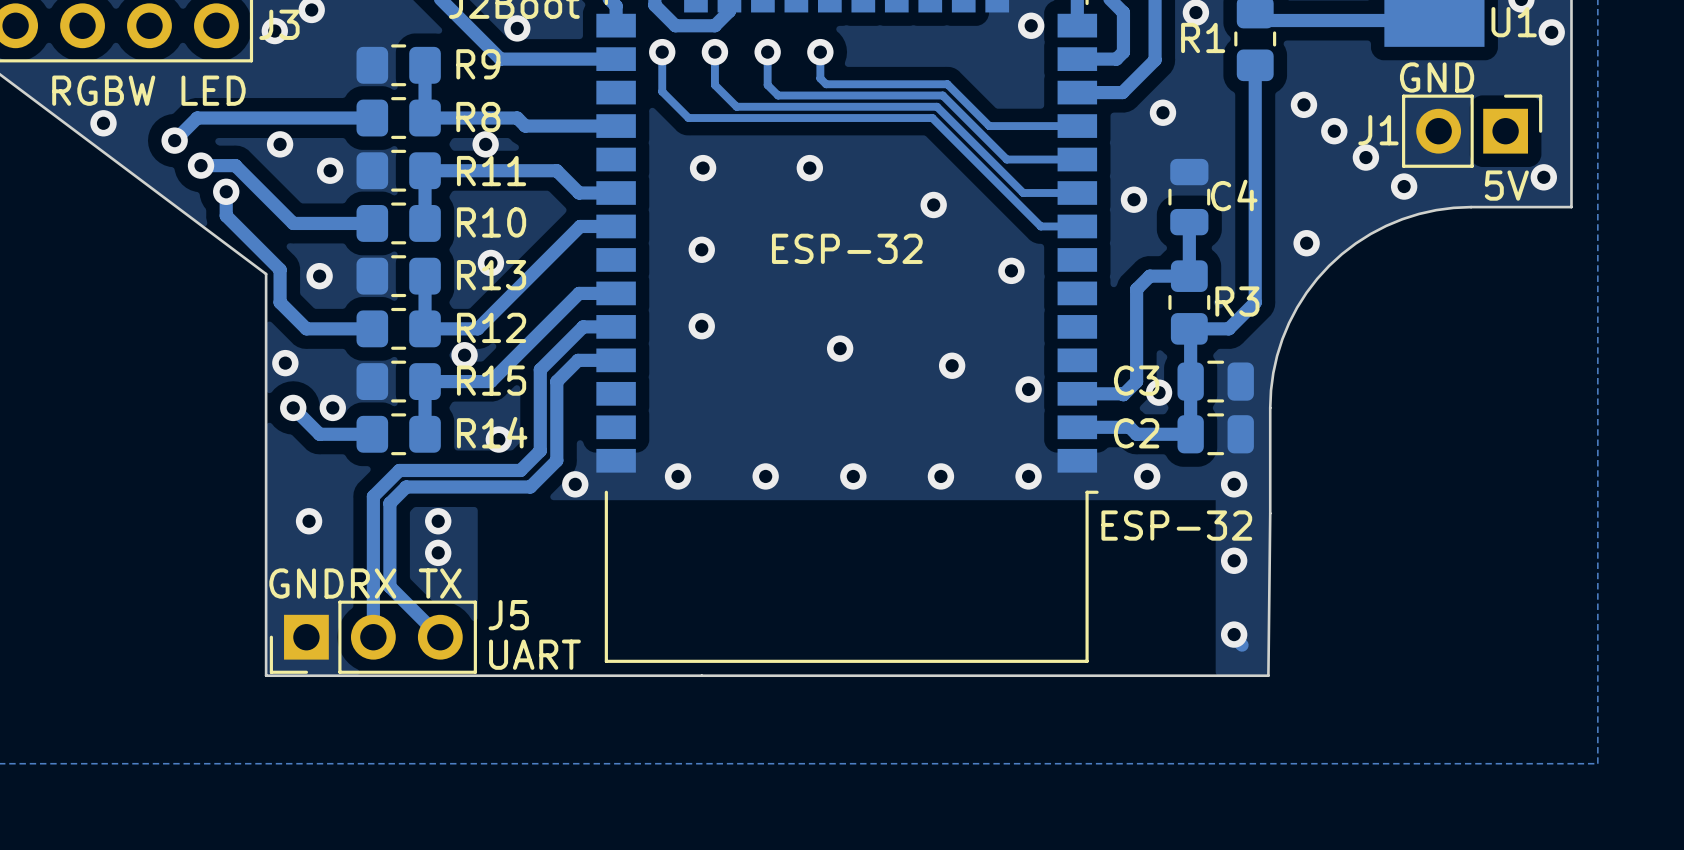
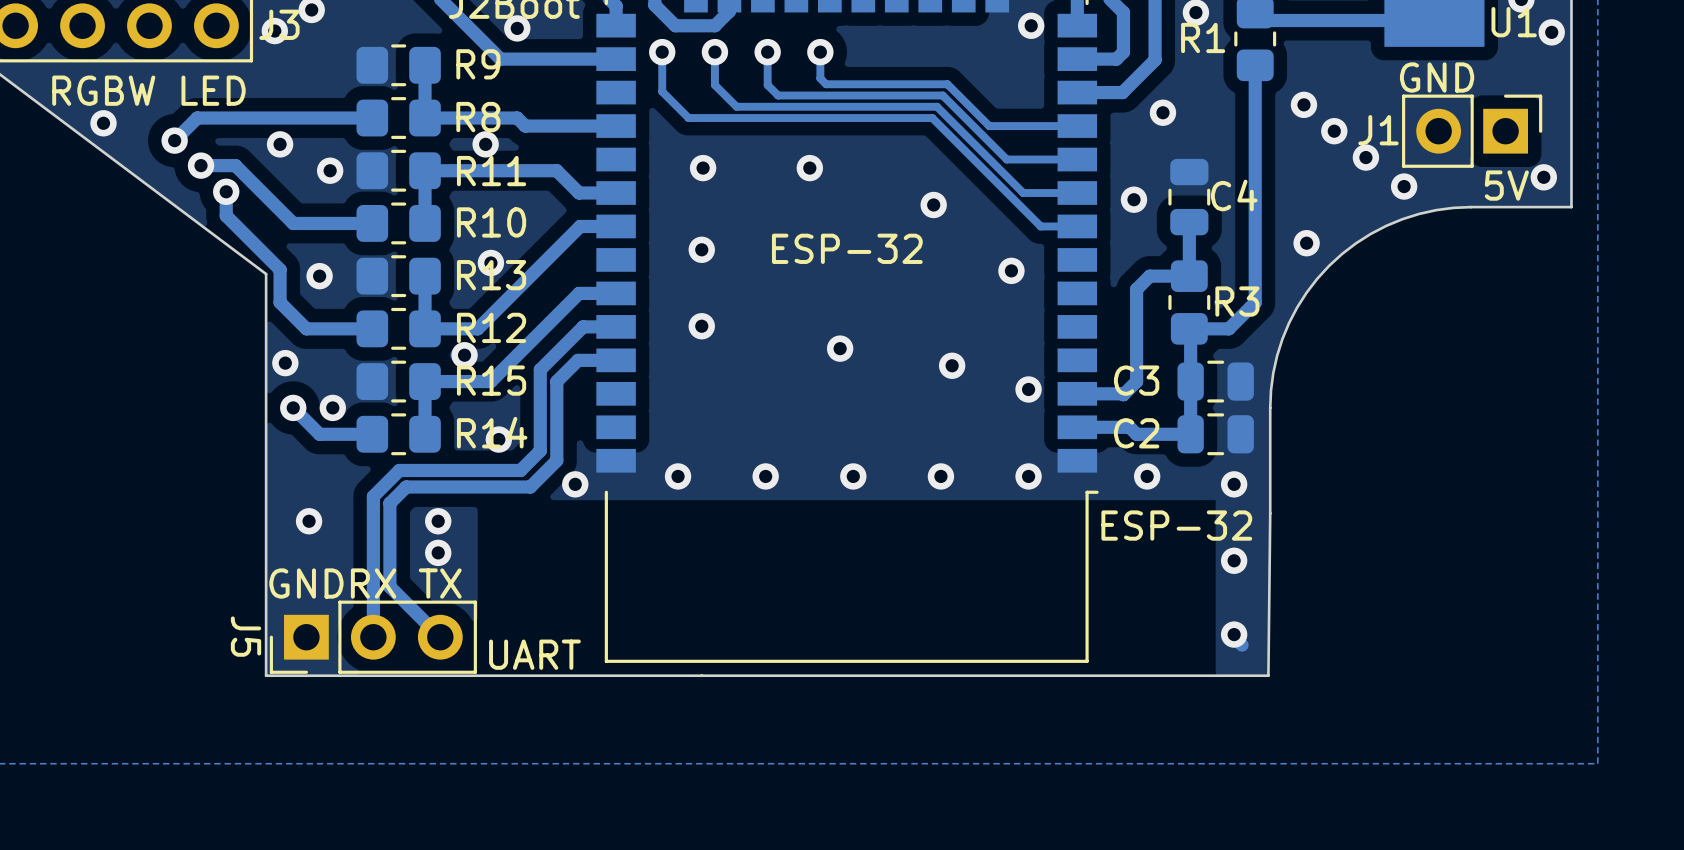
via: (1159, 392) -> none
J5 name rotation: 0° (508, 615) -> 90° clockwise (246, 636)
J5 name position: J5 (508, 615) -> J5 (246, 636)

